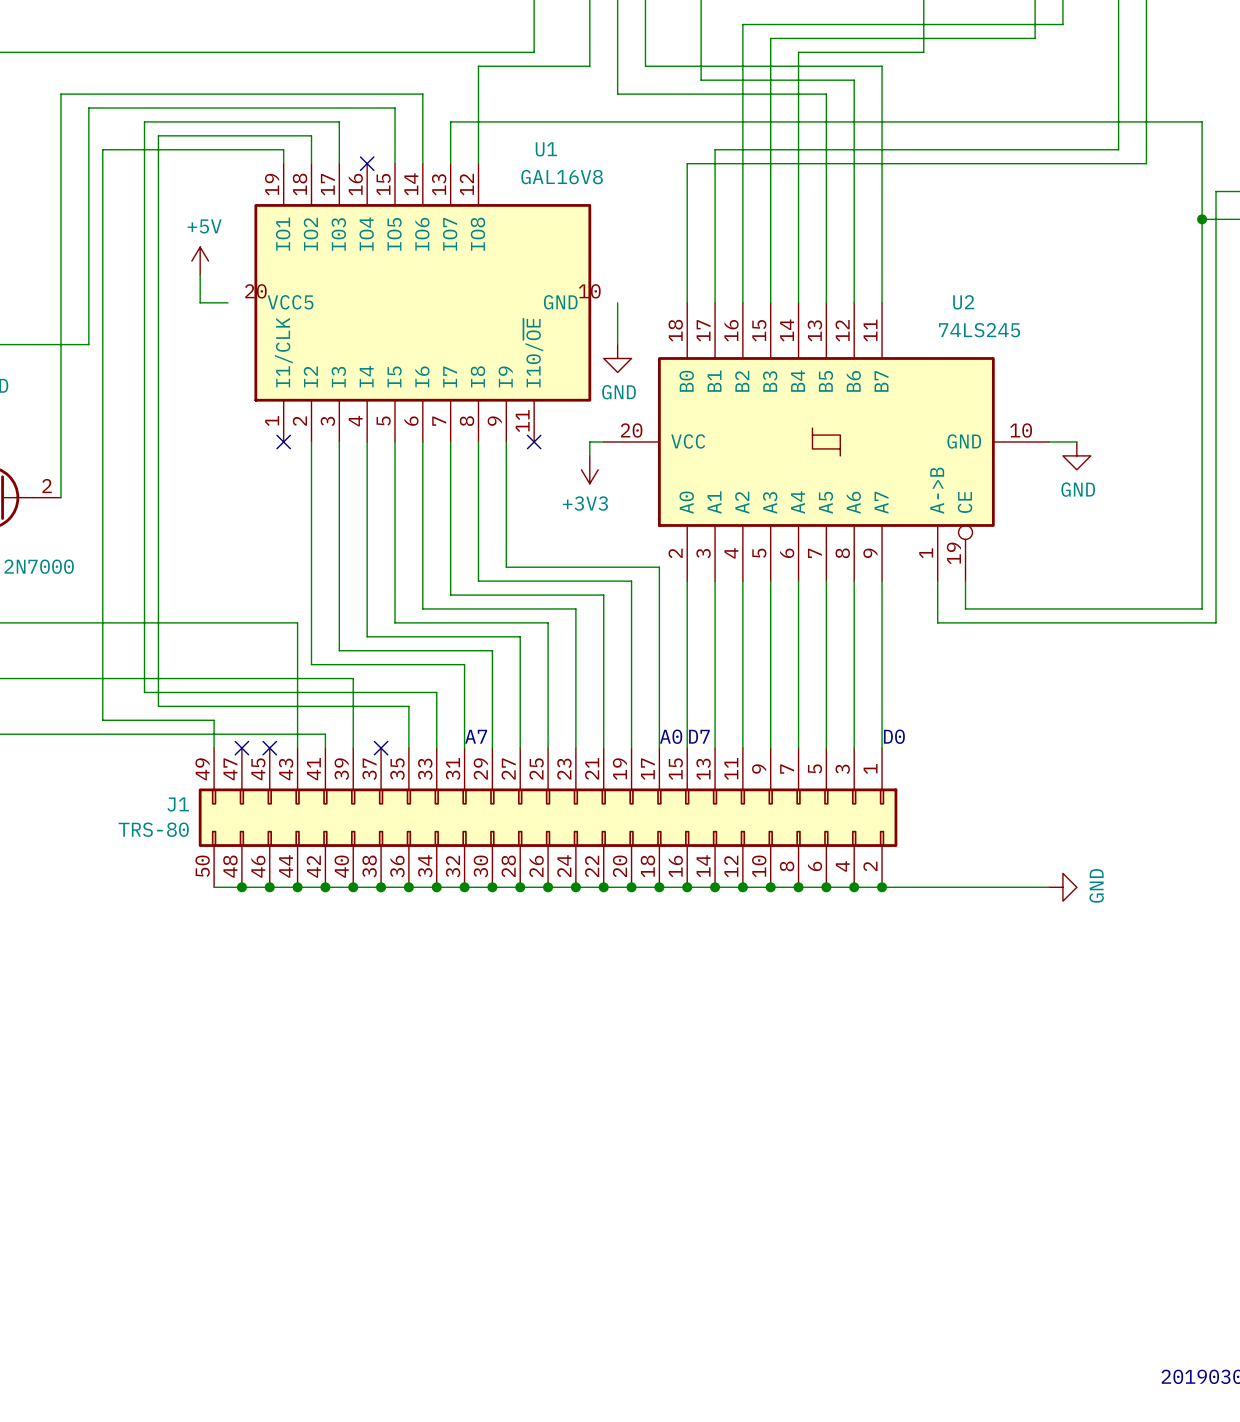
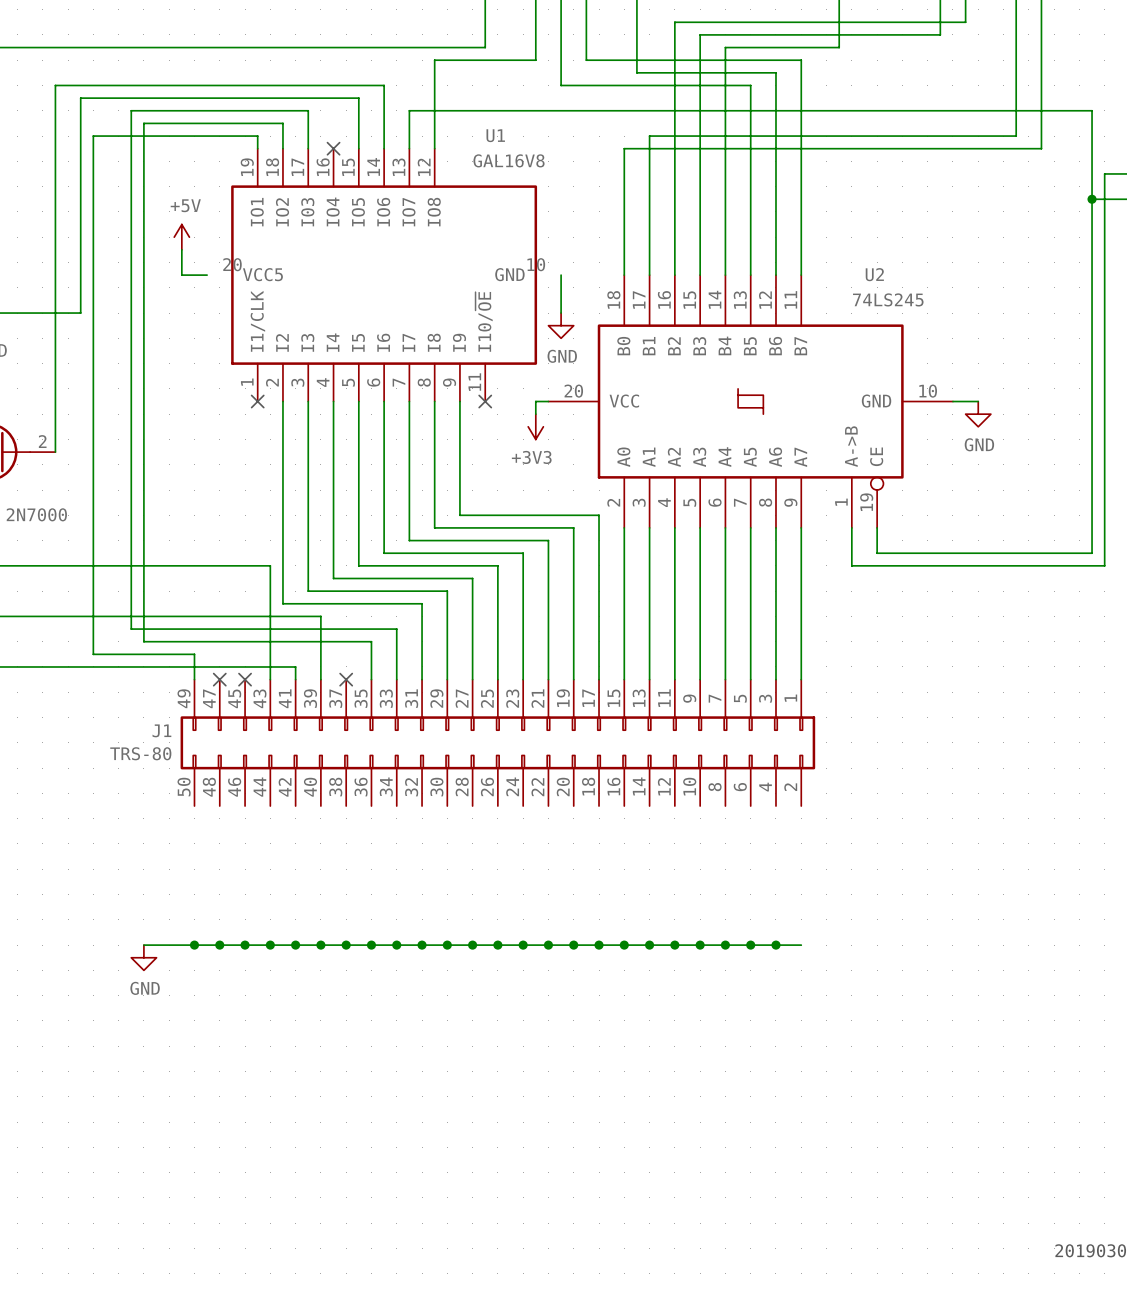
text: A7 (476, 736) -> none
text: A0 (671, 736) -> none
text: D7 (699, 736) -> none
text: D0 (894, 736) -> none
wire: (214, 887) (1049, 887) -> none
junction: (241, 887) -> none
junction: (269, 887) -> none
junction: (297, 887) -> none
junction: (325, 887) -> none
junction: (353, 887) -> none
junction: (381, 887) -> none
junction: (408, 887) -> none
junction: (436, 887) -> none
junction: (464, 887) -> none
junction: (492, 887) -> none
junction: (520, 887) -> none
junction: (548, 887) -> none
junction: (575, 887) -> none
junction: (603, 887) -> none
junction: (631, 887) -> none
junction: (659, 887) -> none
junction: (687, 887) -> none
junction: (715, 887) -> none
junction: (742, 887) -> none
junction: (770, 887) -> none
junction: (798, 887) -> none
junction: (826, 887) -> none
junction: (854, 887) -> none
junction: (882, 887) -> none
power symbol: GND (1062, 887) -> none
wire: none -> (143, 945) (801, 945)
junction: none -> (194, 945)
junction: none -> (219, 945)
junction: none -> (245, 945)
junction: none -> (270, 945)
junction: none -> (295, 945)
junction: none -> (320, 945)
junction: none -> (346, 945)
junction: none -> (371, 945)
junction: none -> (396, 945)
junction: none -> (422, 945)
junction: none -> (447, 945)
junction: none -> (472, 945)
junction: none -> (497, 945)
junction: none -> (523, 945)
junction: none -> (548, 945)
junction: none -> (573, 945)
junction: none -> (599, 945)
junction: none -> (624, 945)
junction: none -> (649, 945)
junction: none -> (674, 945)
junction: none -> (700, 945)
junction: none -> (725, 945)
junction: none -> (750, 945)
junction: none -> (775, 945)
power symbol: none -> GND (143, 957)

